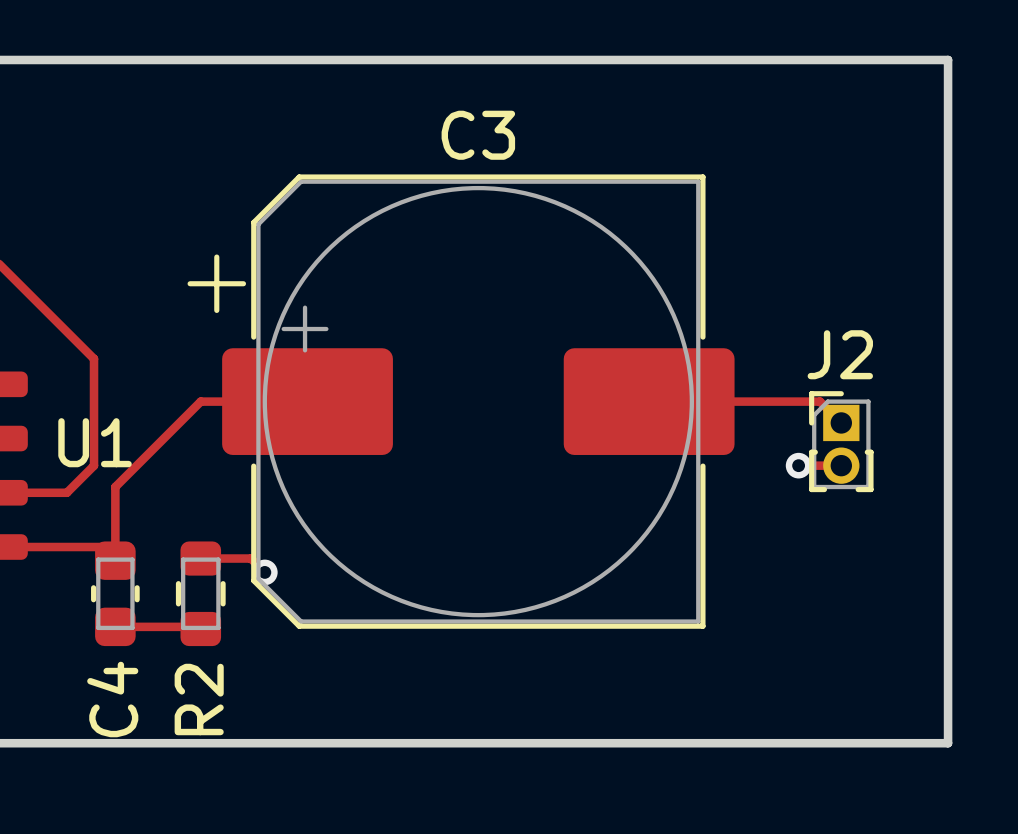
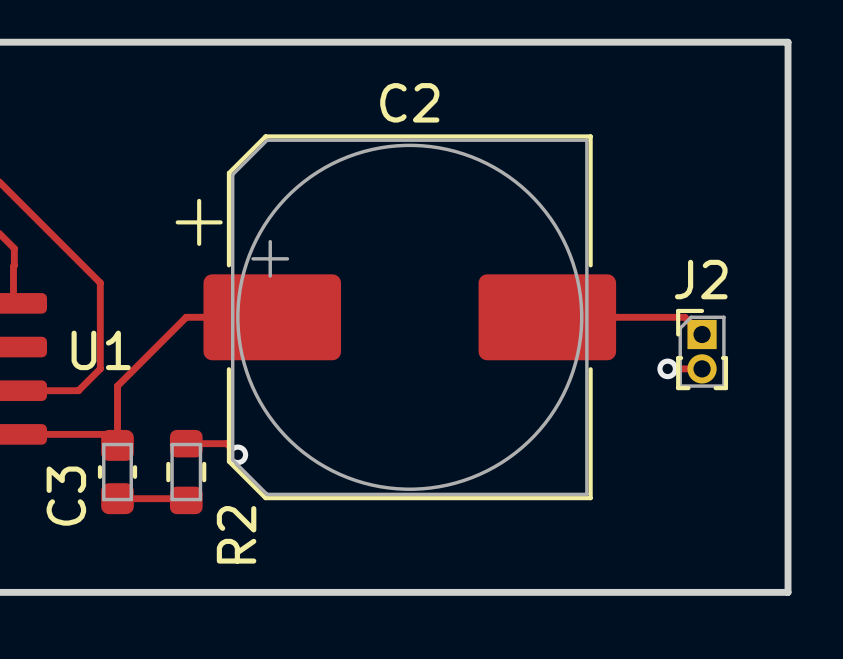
C3 name: C3 (478, 135) -> C2 (409, 102)
C4 name: C4 (112, 699) -> C3 (66, 496)
R2 name position: R2 (199, 699) -> R2 (236, 534)

